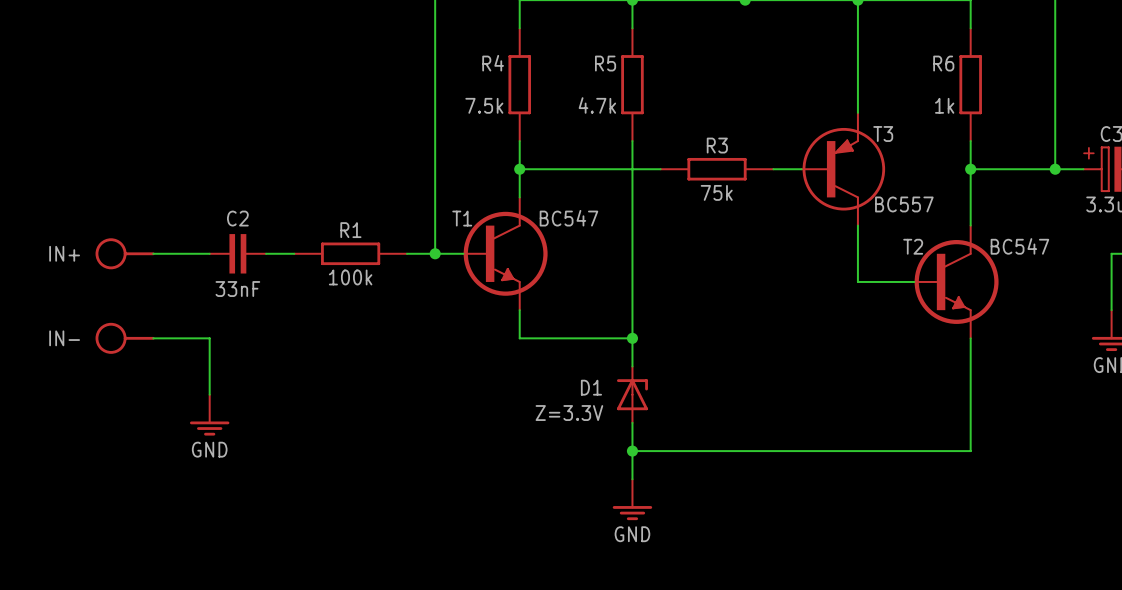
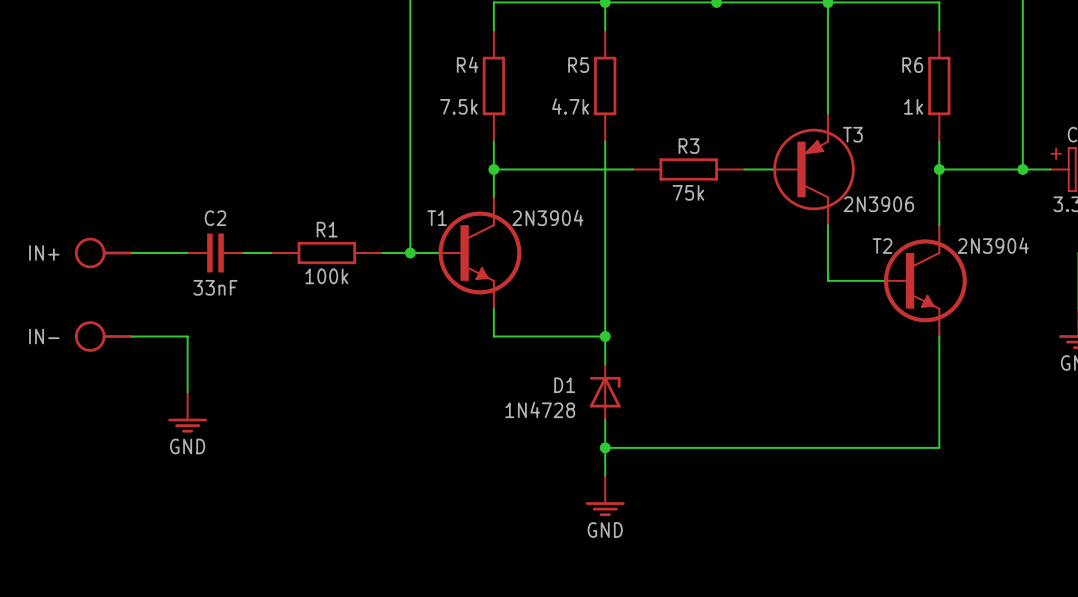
T3 value: BC557 (904, 204) -> 2N3906 (878, 204)
T1 value: BC547 (568, 218) -> 2N3904 (547, 217)
T2 value: BC547 (1019, 246) -> 2N3904 (993, 245)
D1 value: Z=3.3V (569, 413) -> 1N4728 (540, 409)

